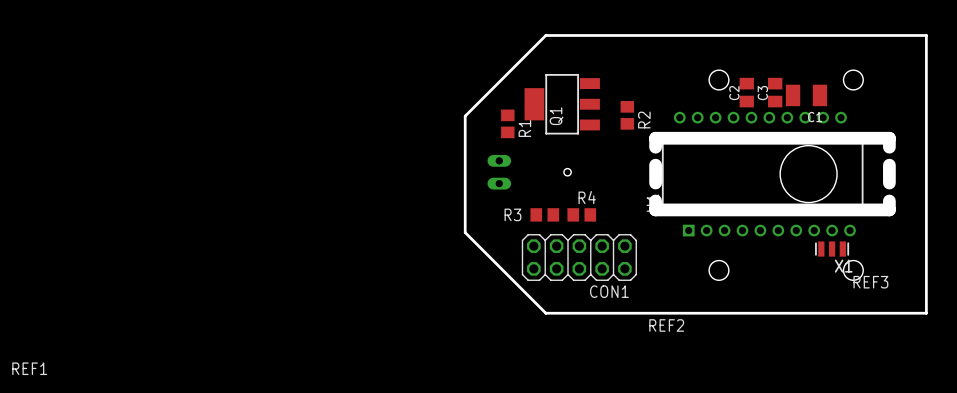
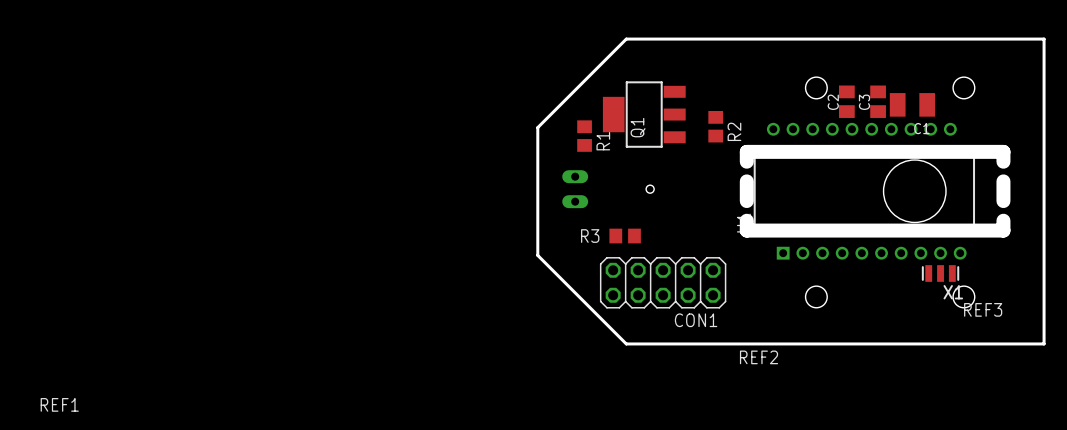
R4: (581, 214) -> none

